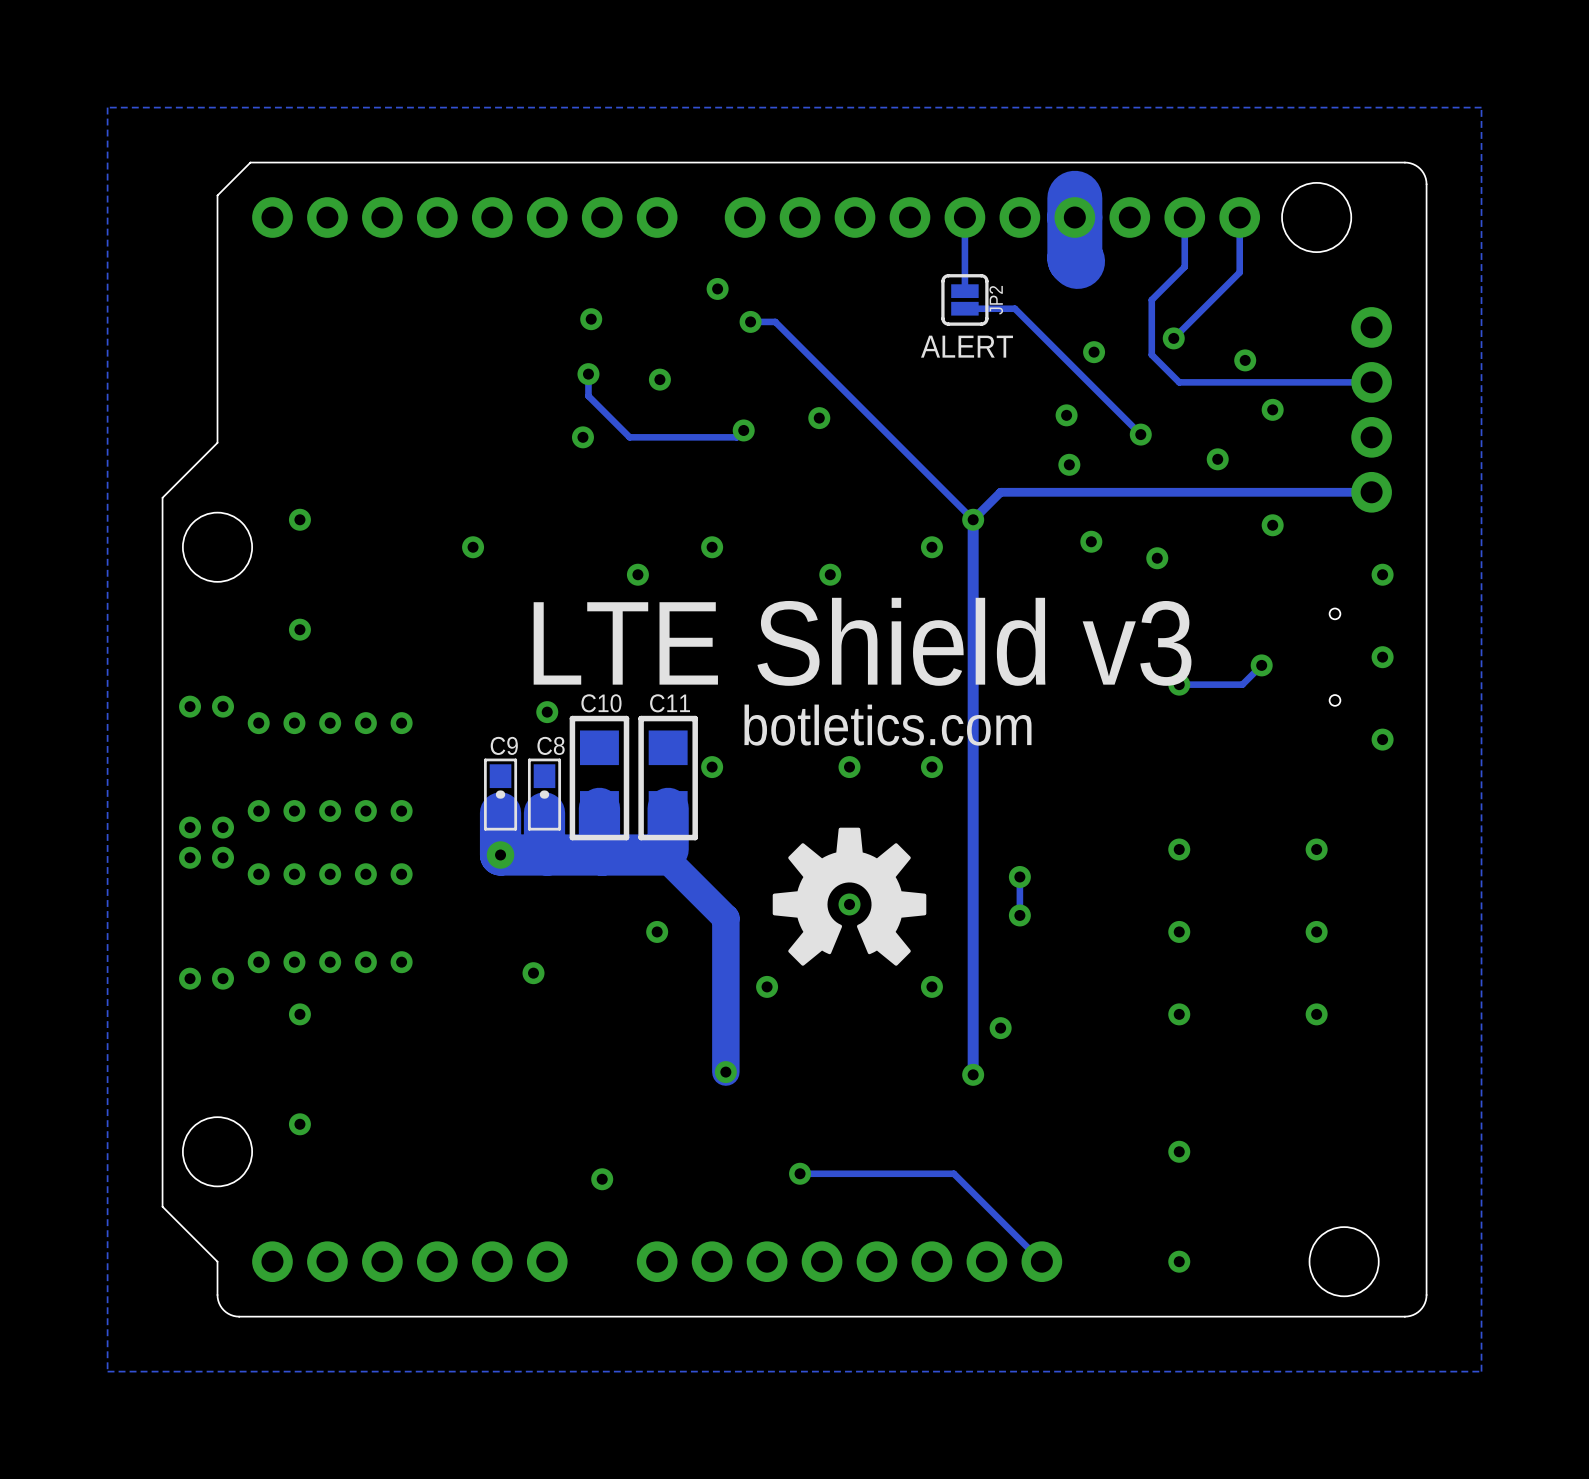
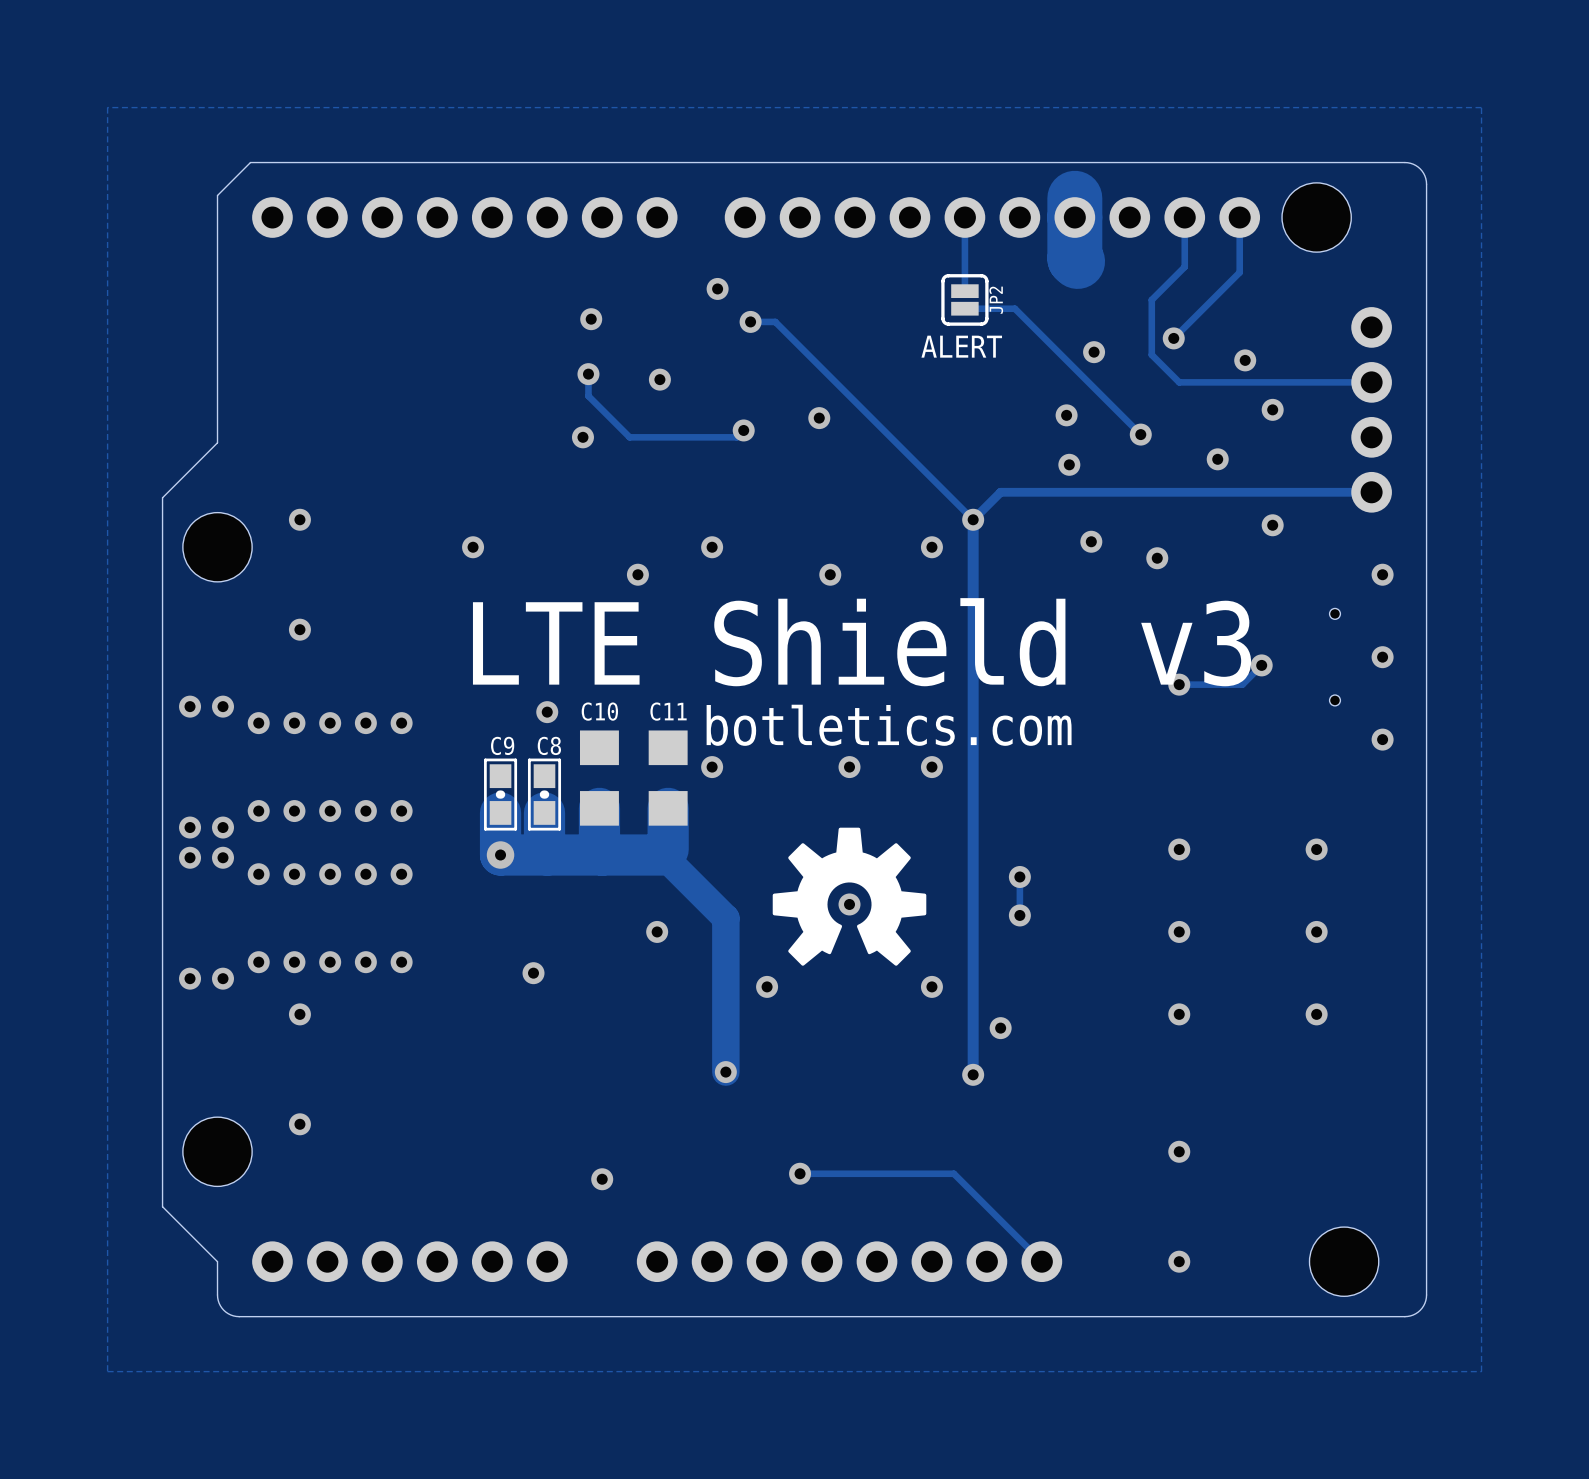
C10 footprint: [569, 715, 630, 841] -> [579, 730, 619, 826]
C11 footprint: [638, 715, 698, 841] -> [648, 730, 688, 826]

